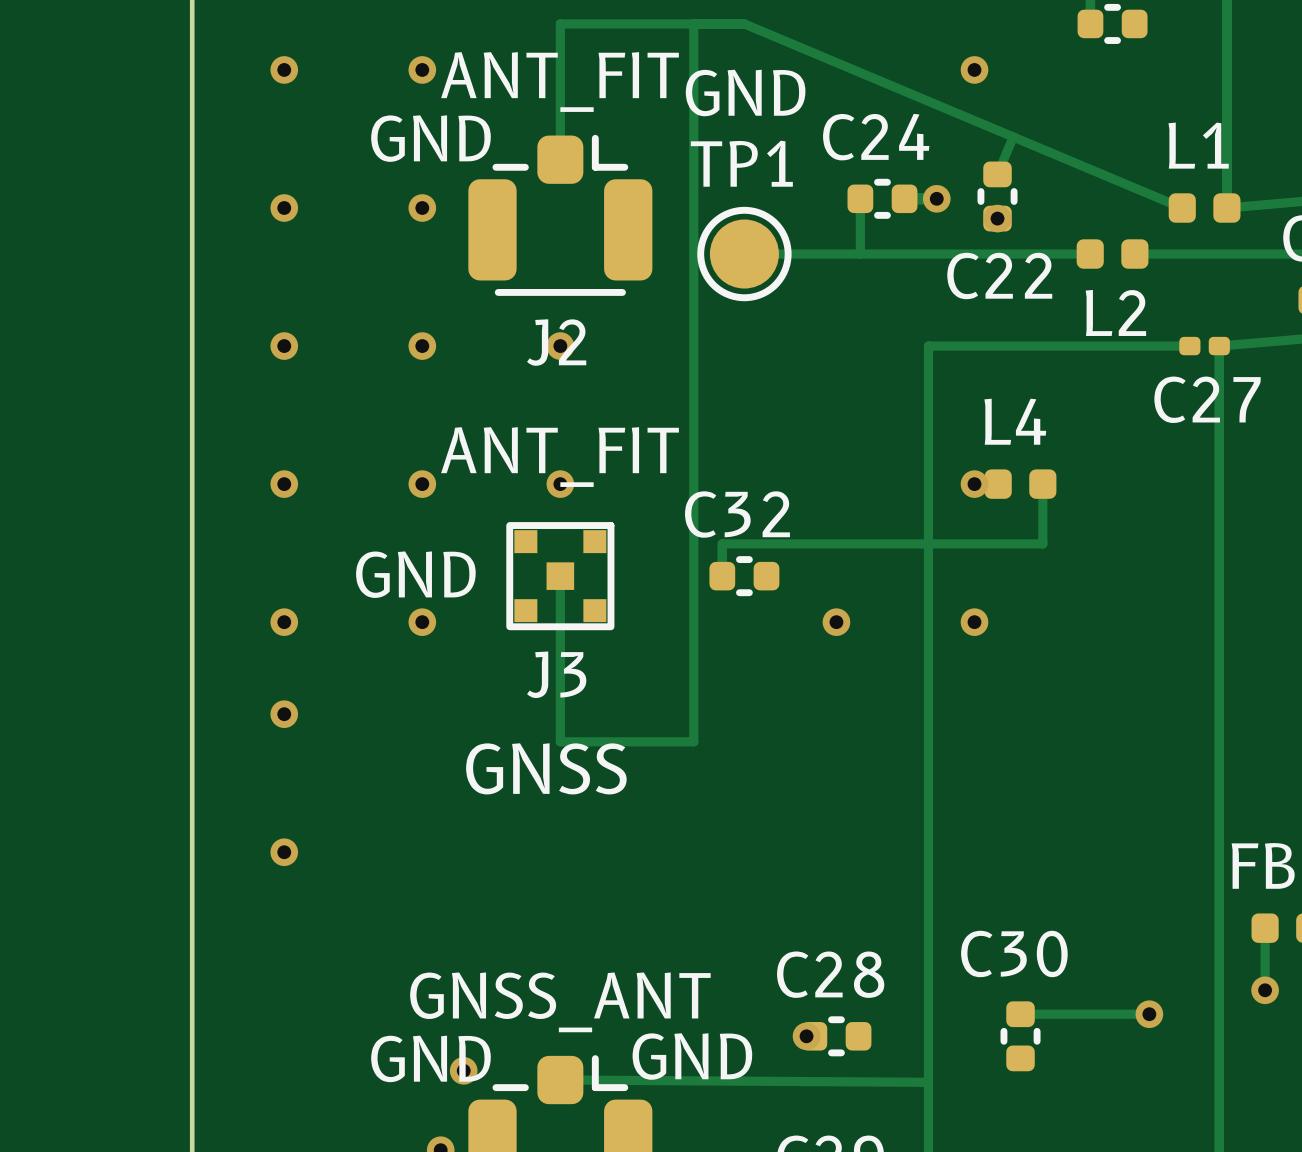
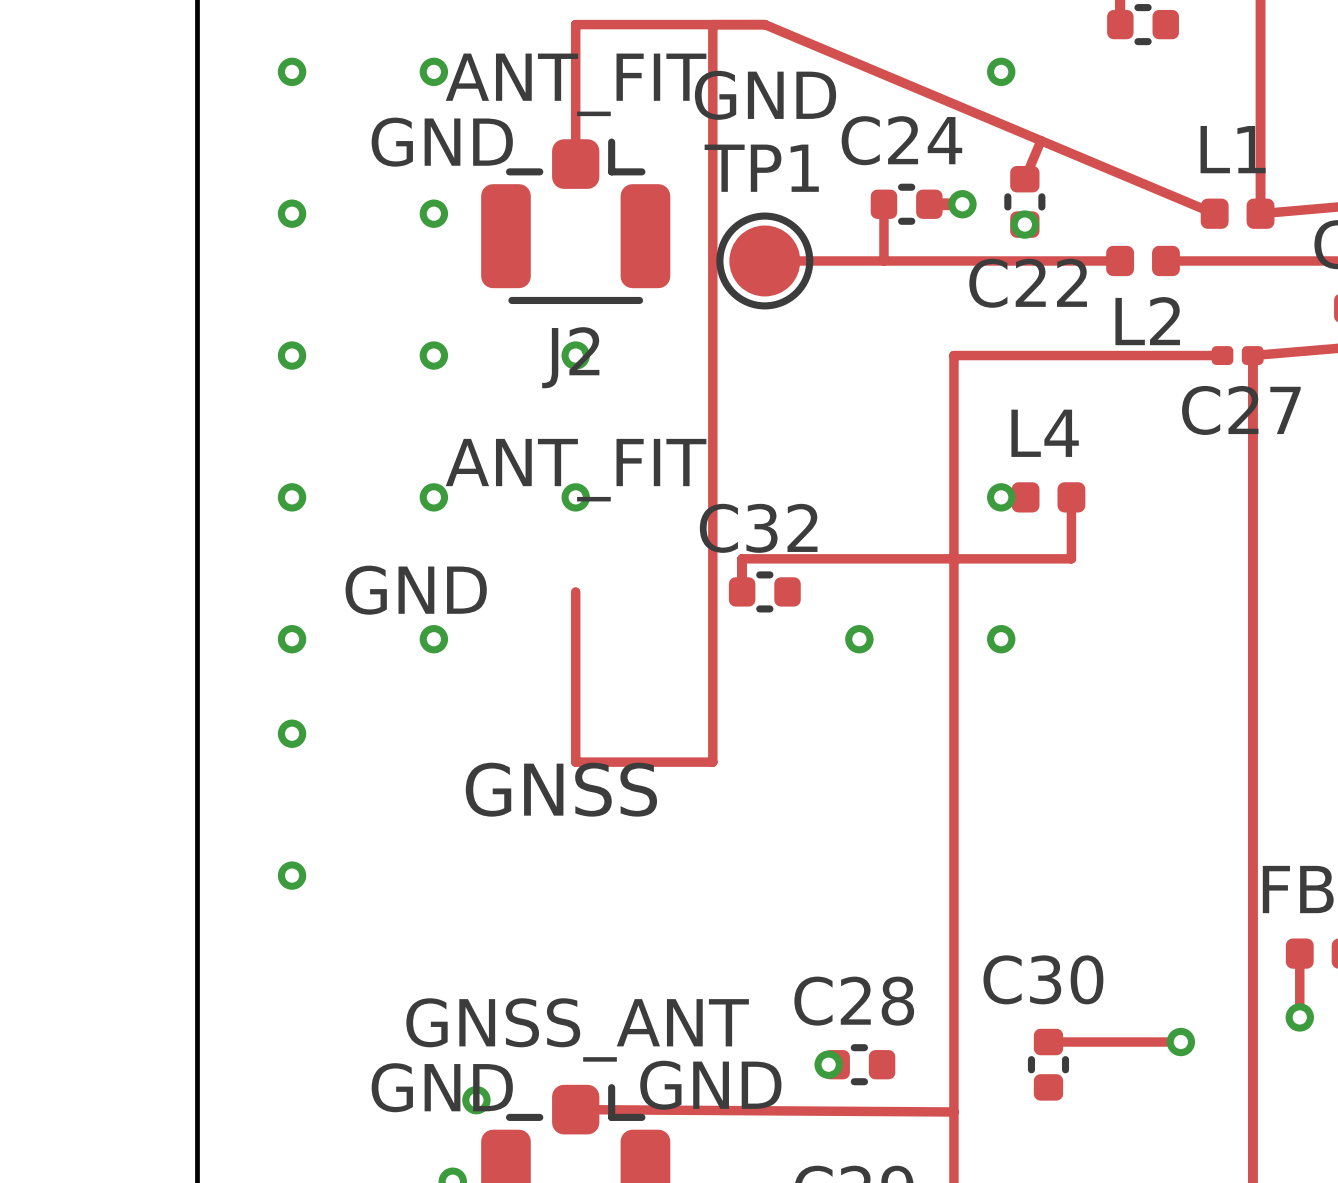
J3: (560, 576) -> none

